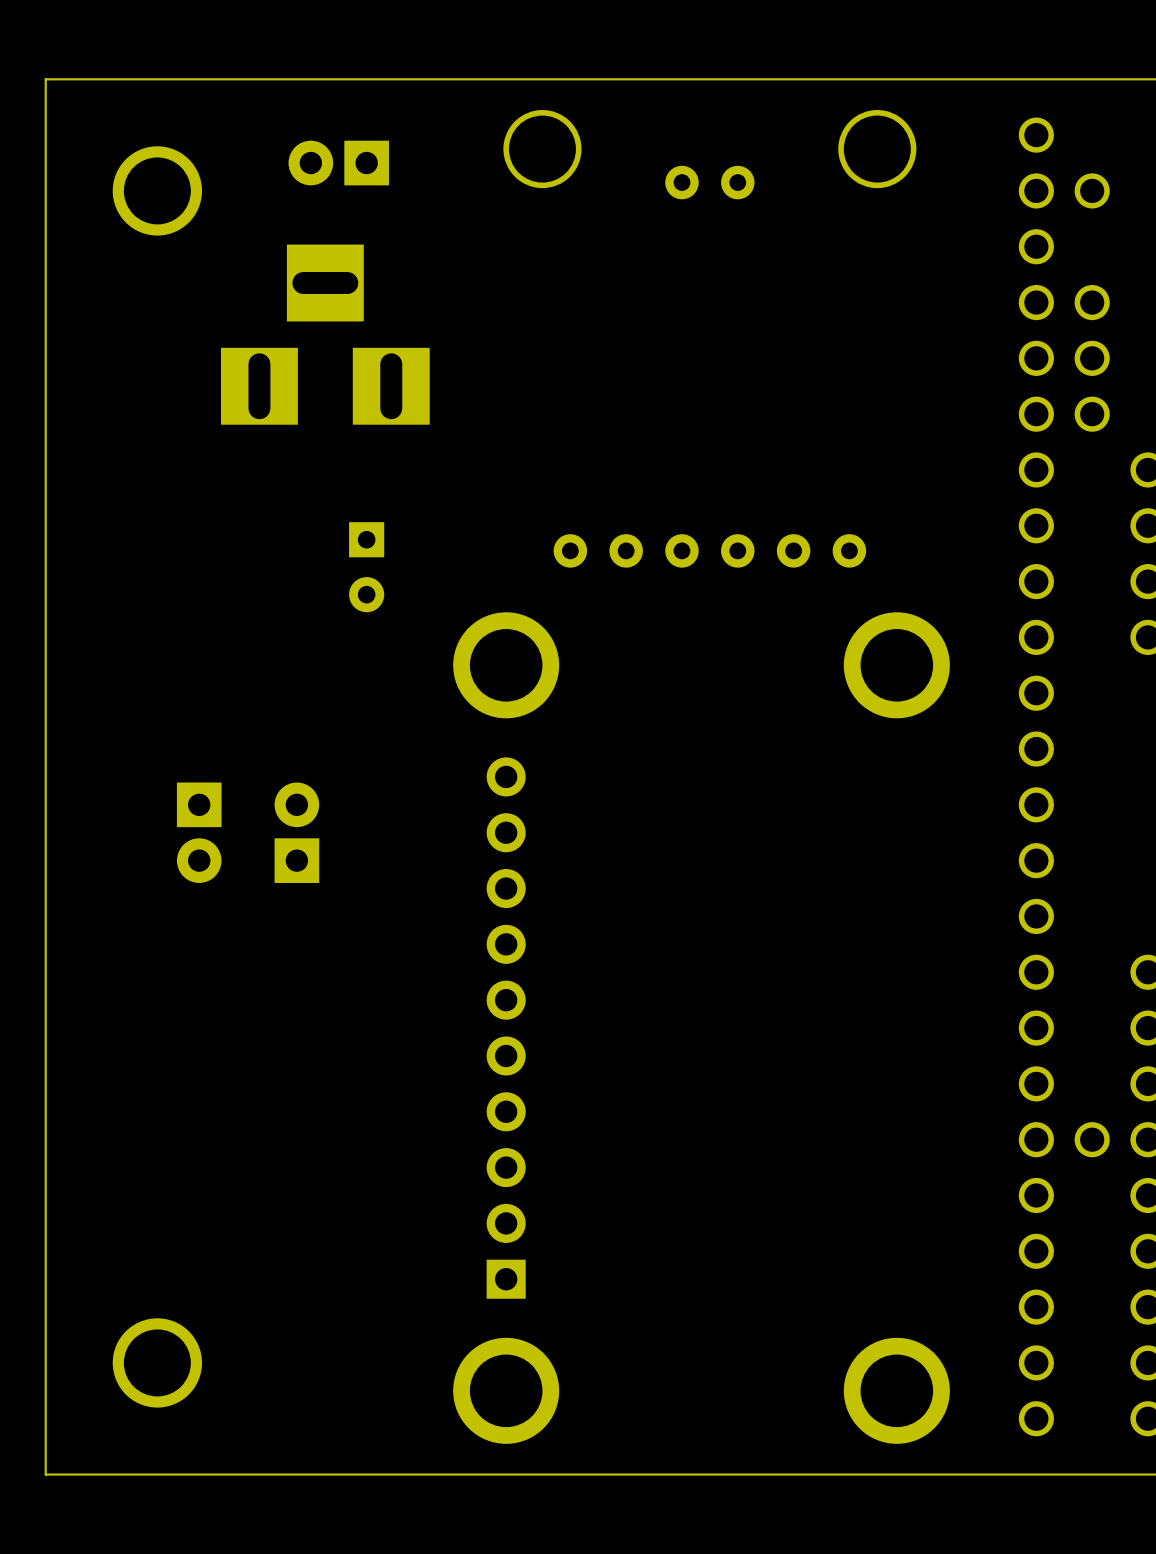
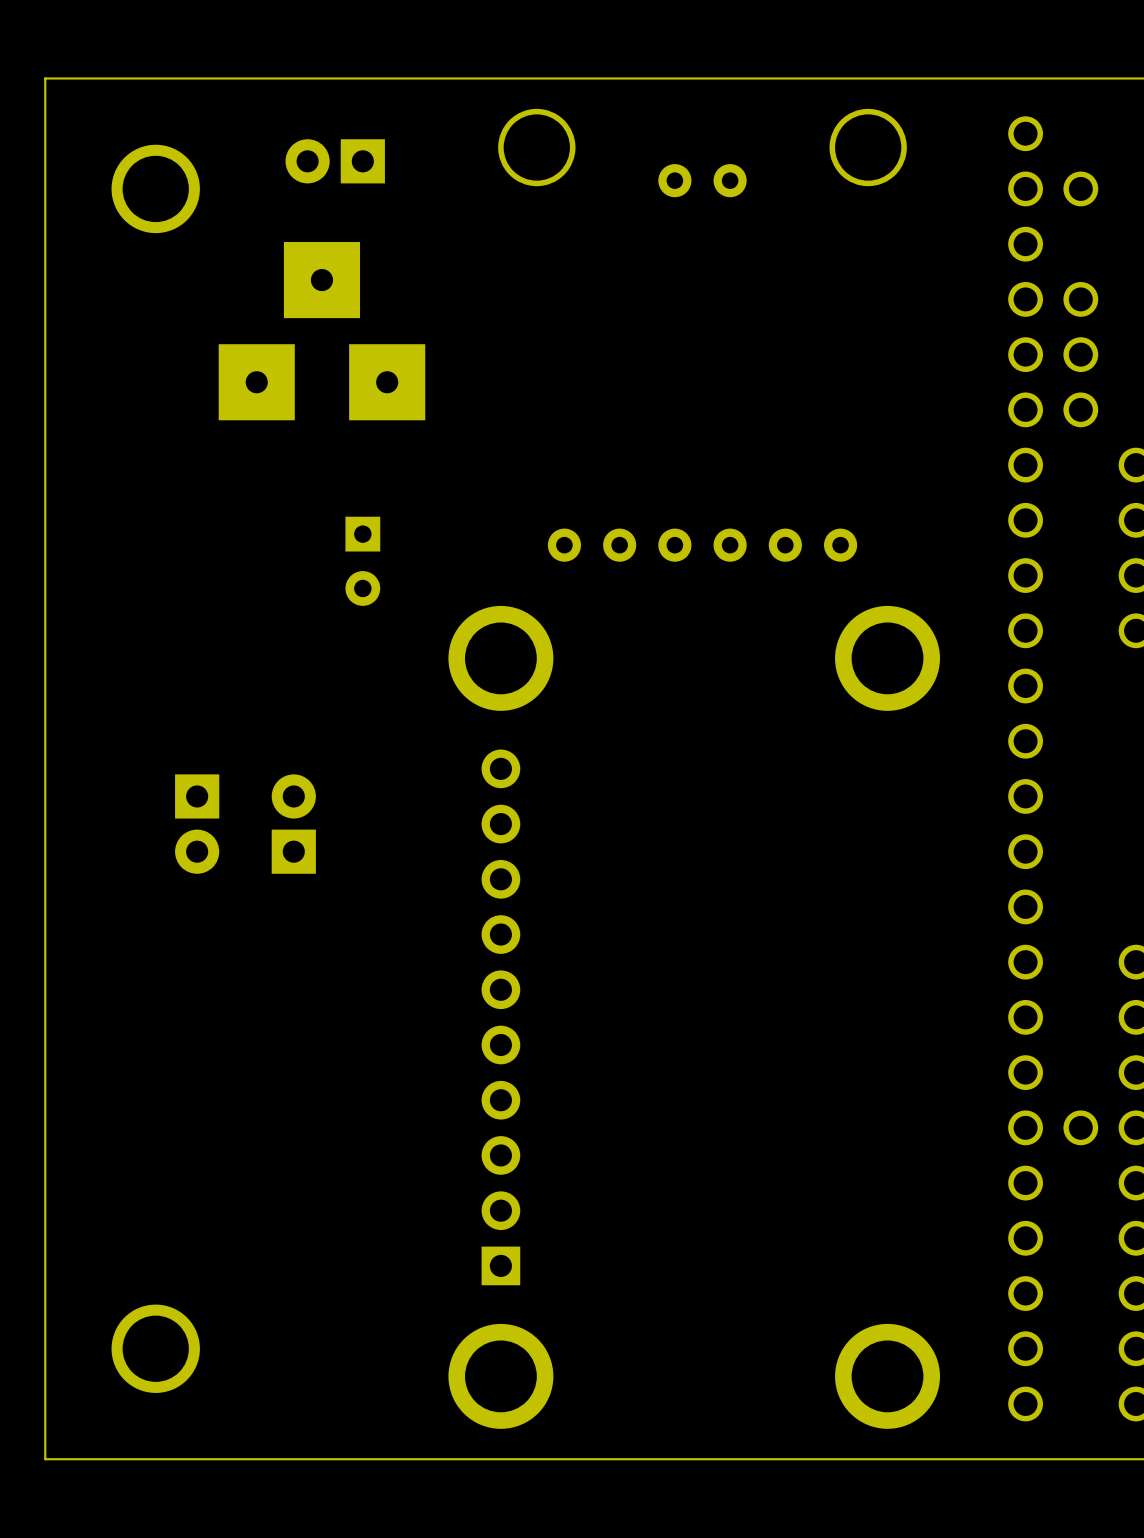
part footprint: [220, 244, 430, 425] -> [218, 242, 426, 421]

